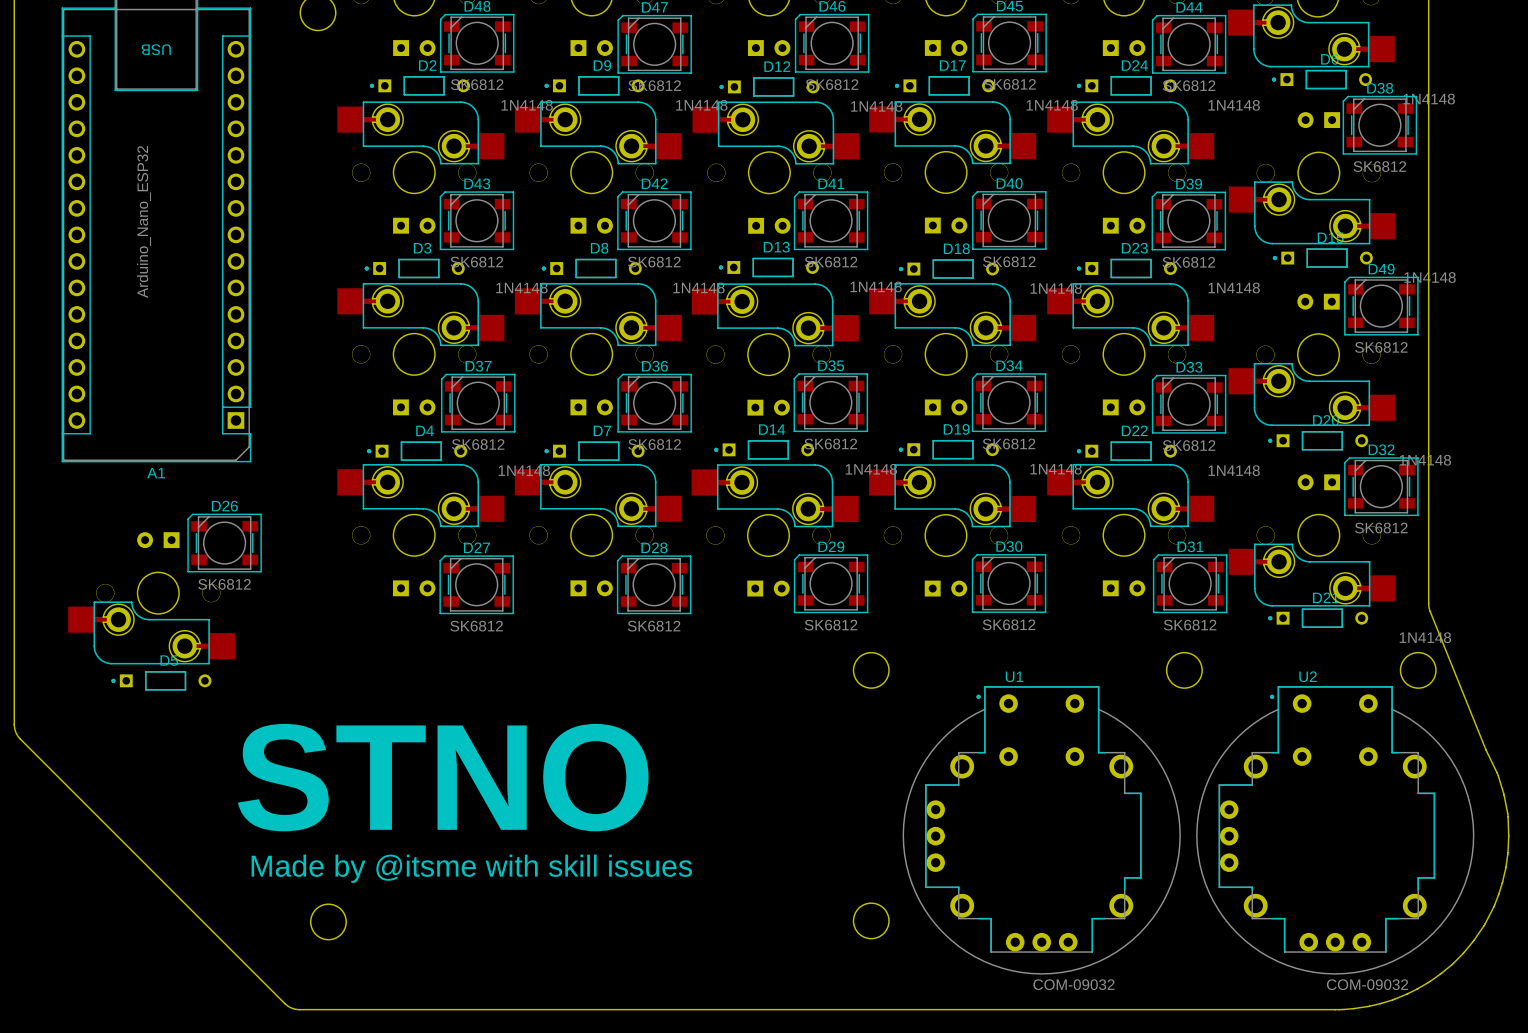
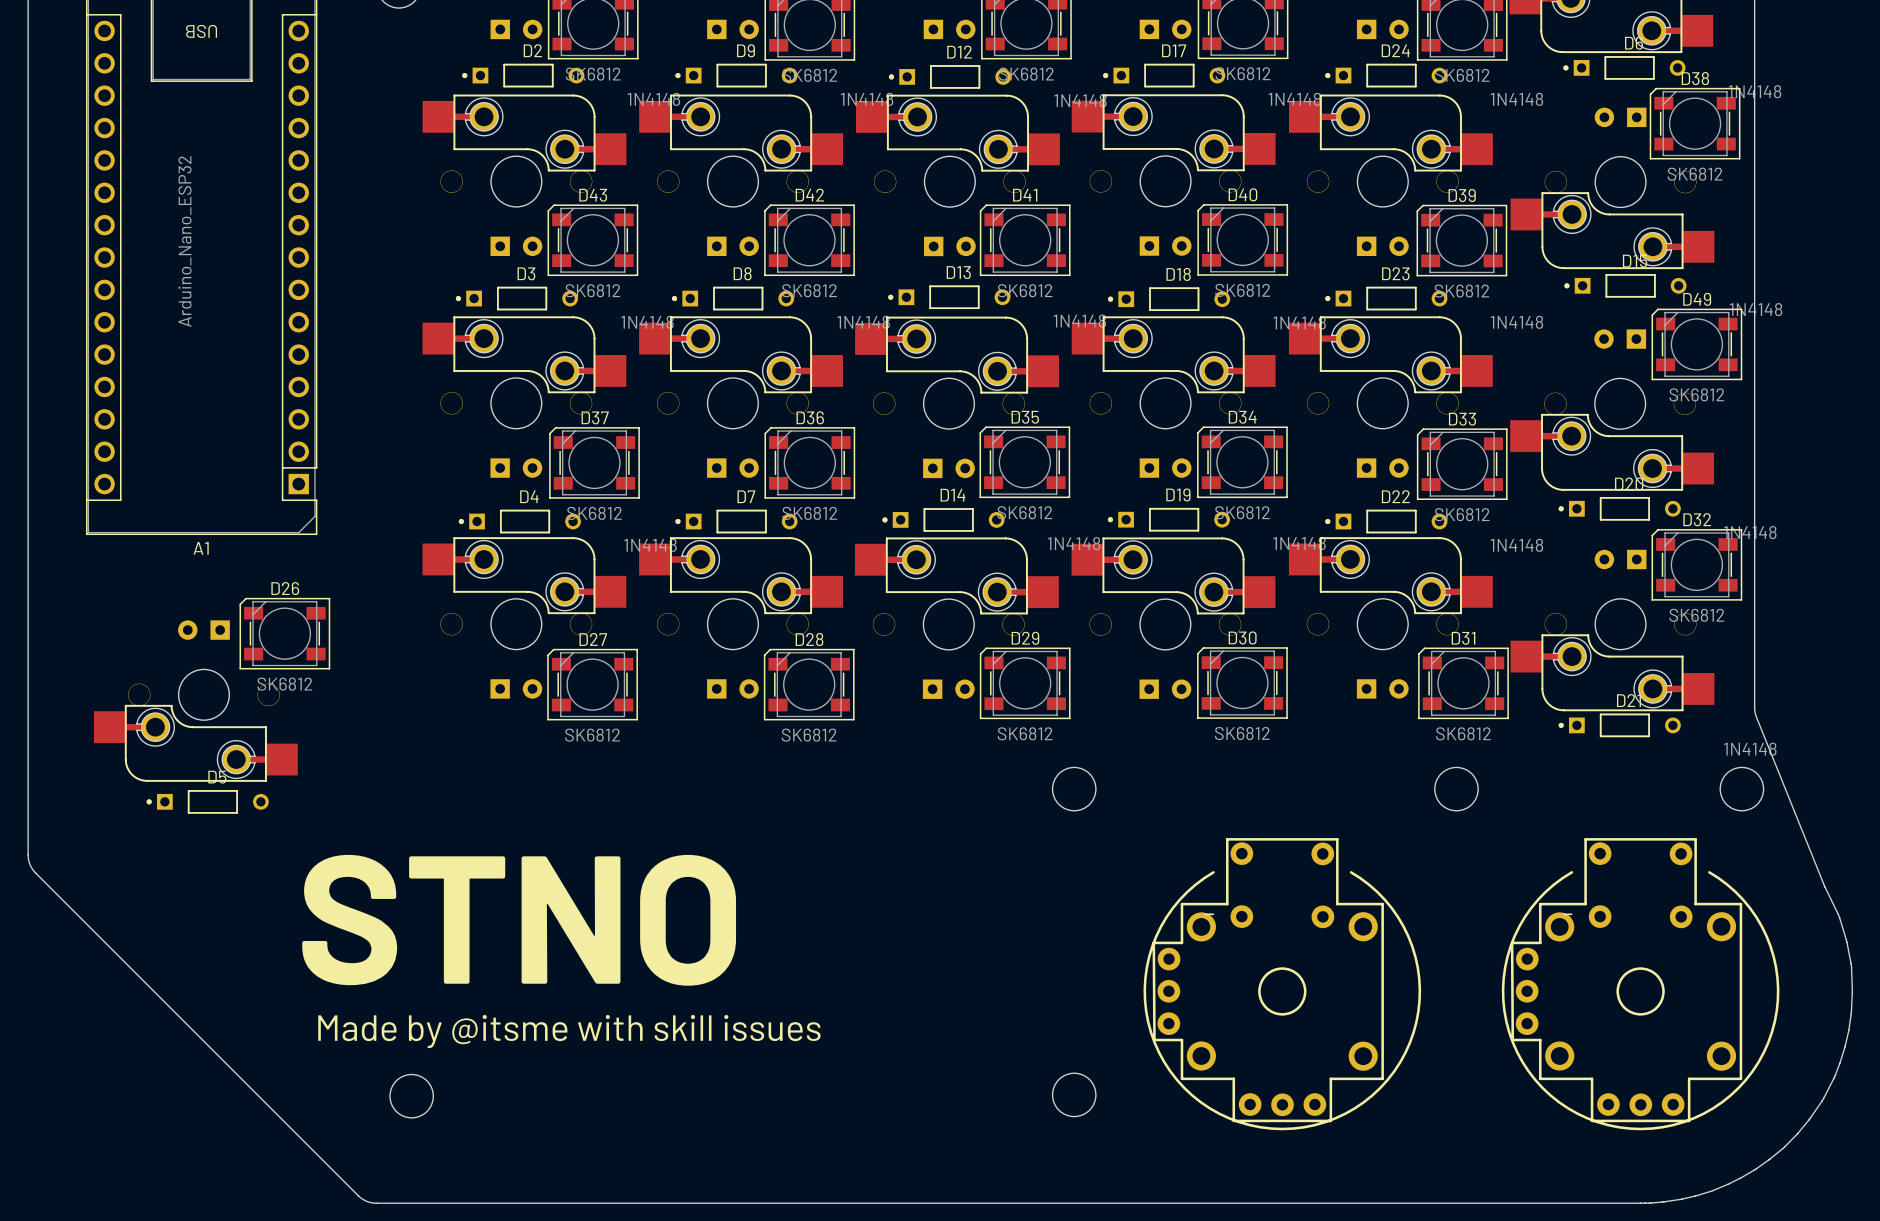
U1: COM-09032 (1041, 830) -> none
part: none -> (1282, 984)
U2: COM-09032 (1335, 830) -> none
part: none -> (1640, 984)

